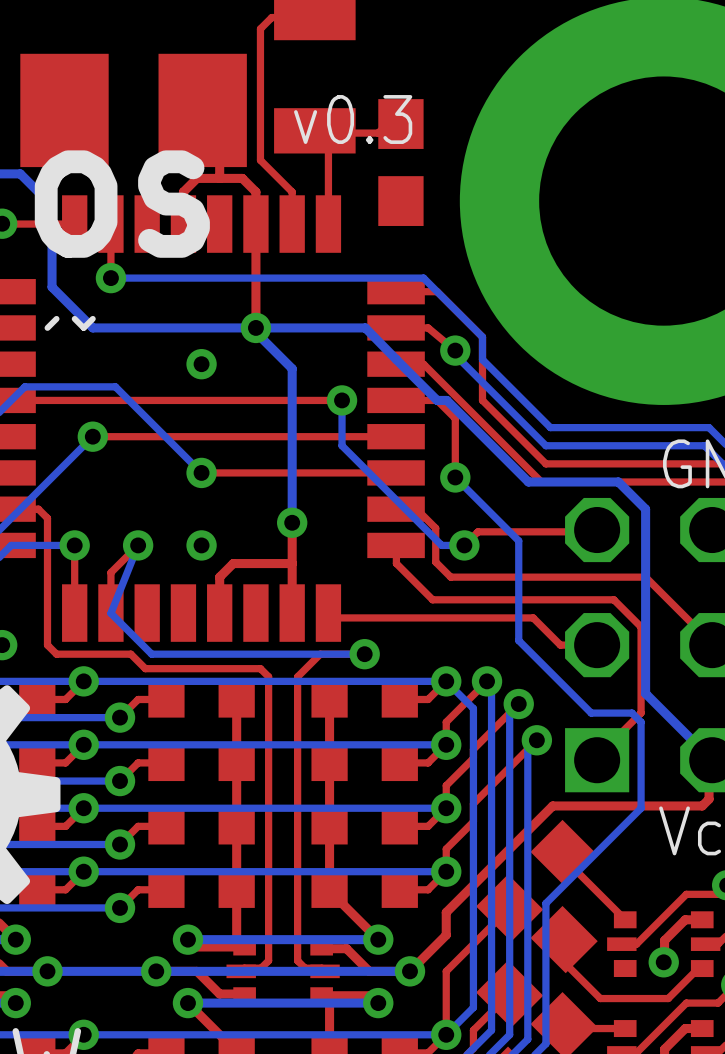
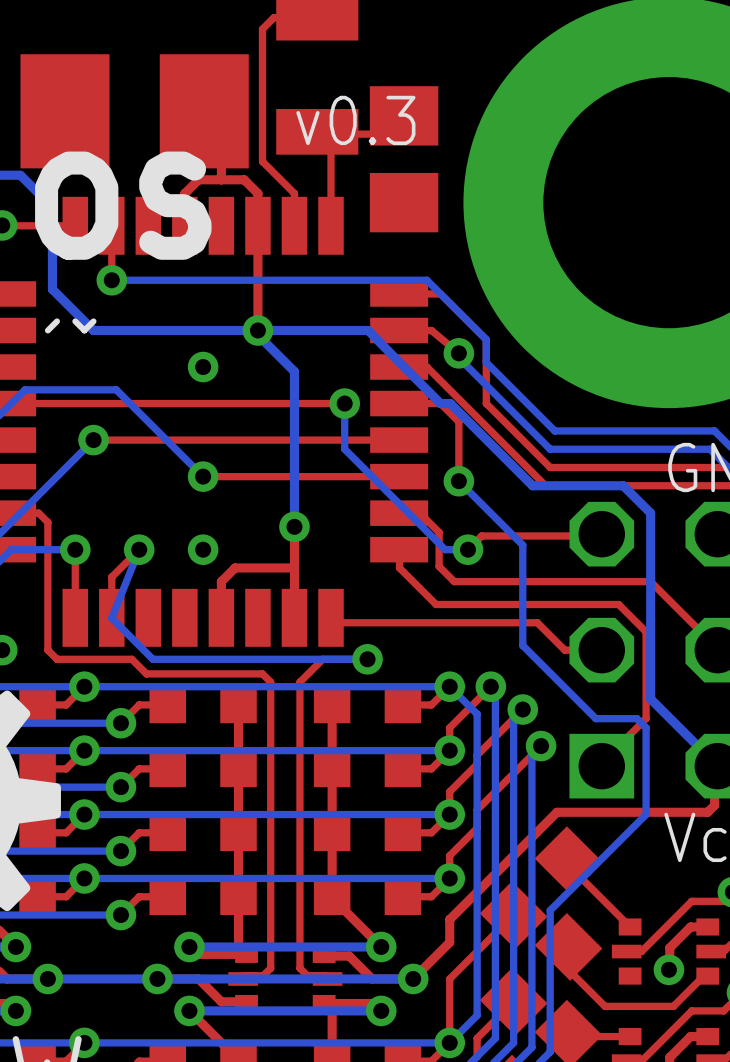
part footprint: [378, 99, 424, 226] -> [369, 86, 439, 233]

